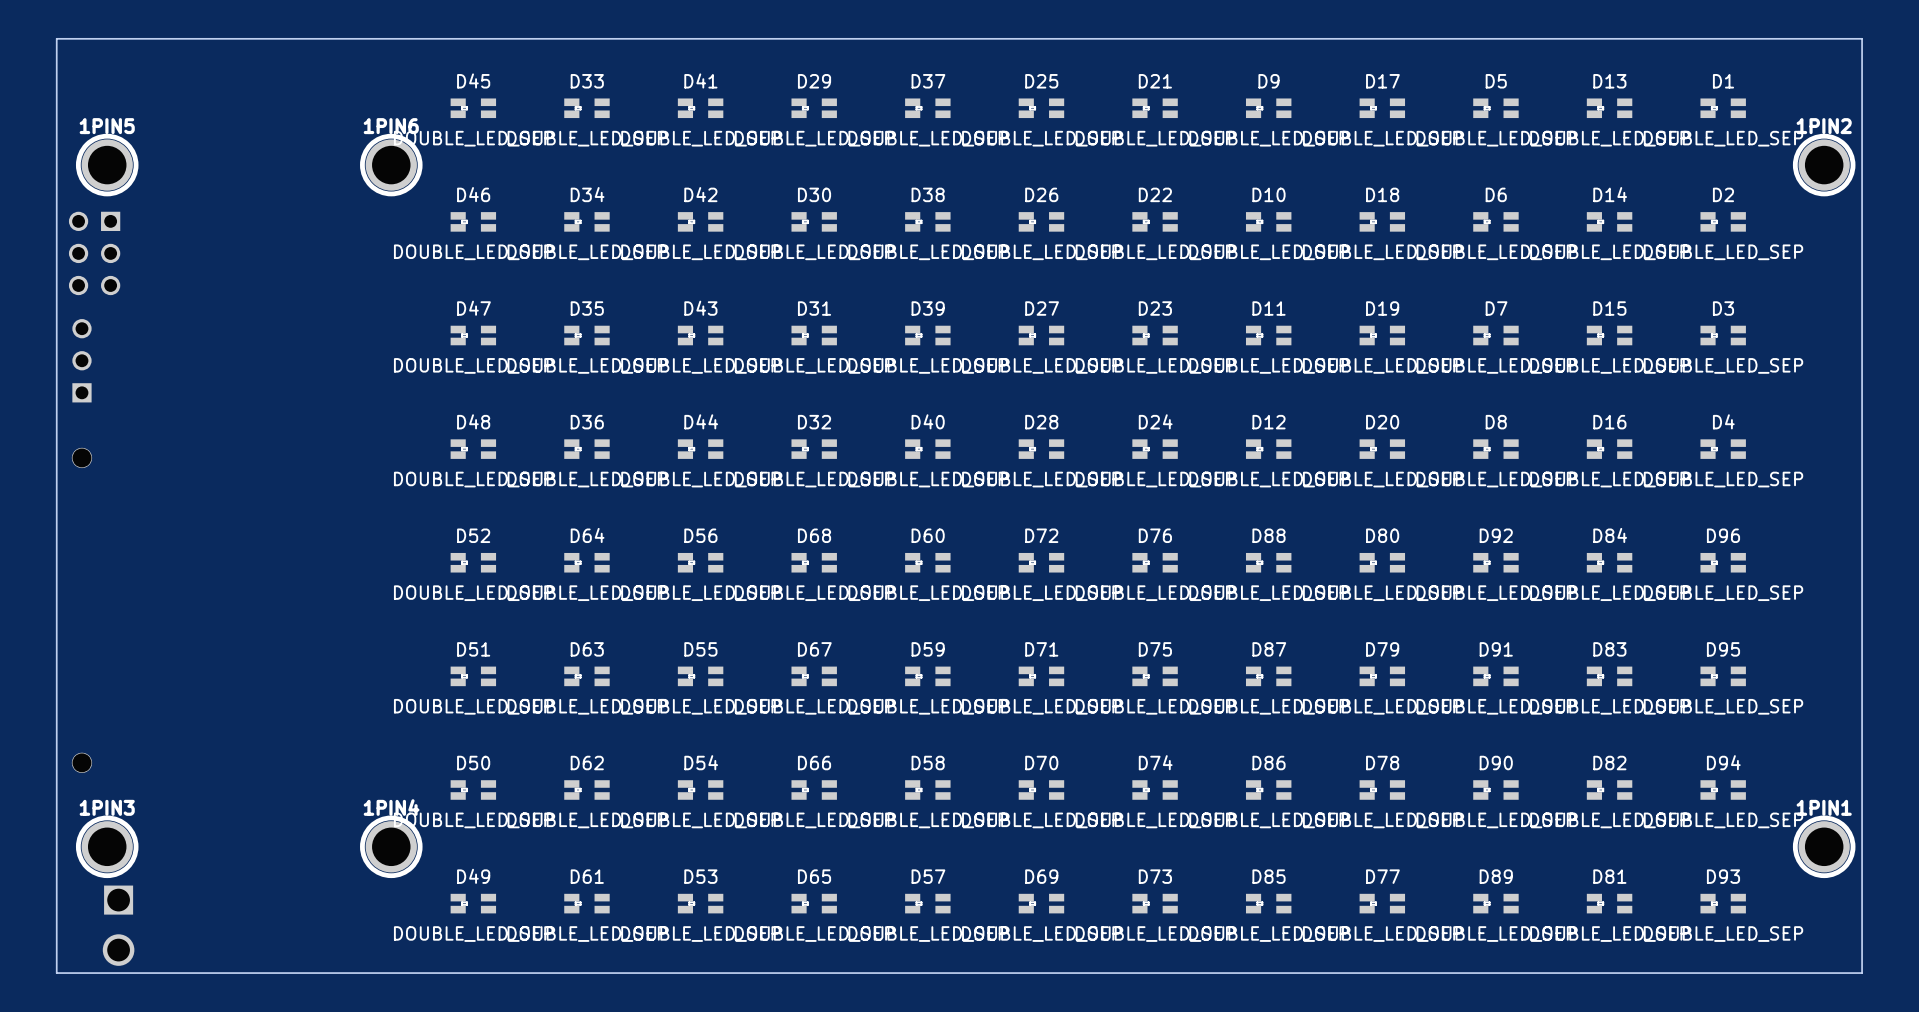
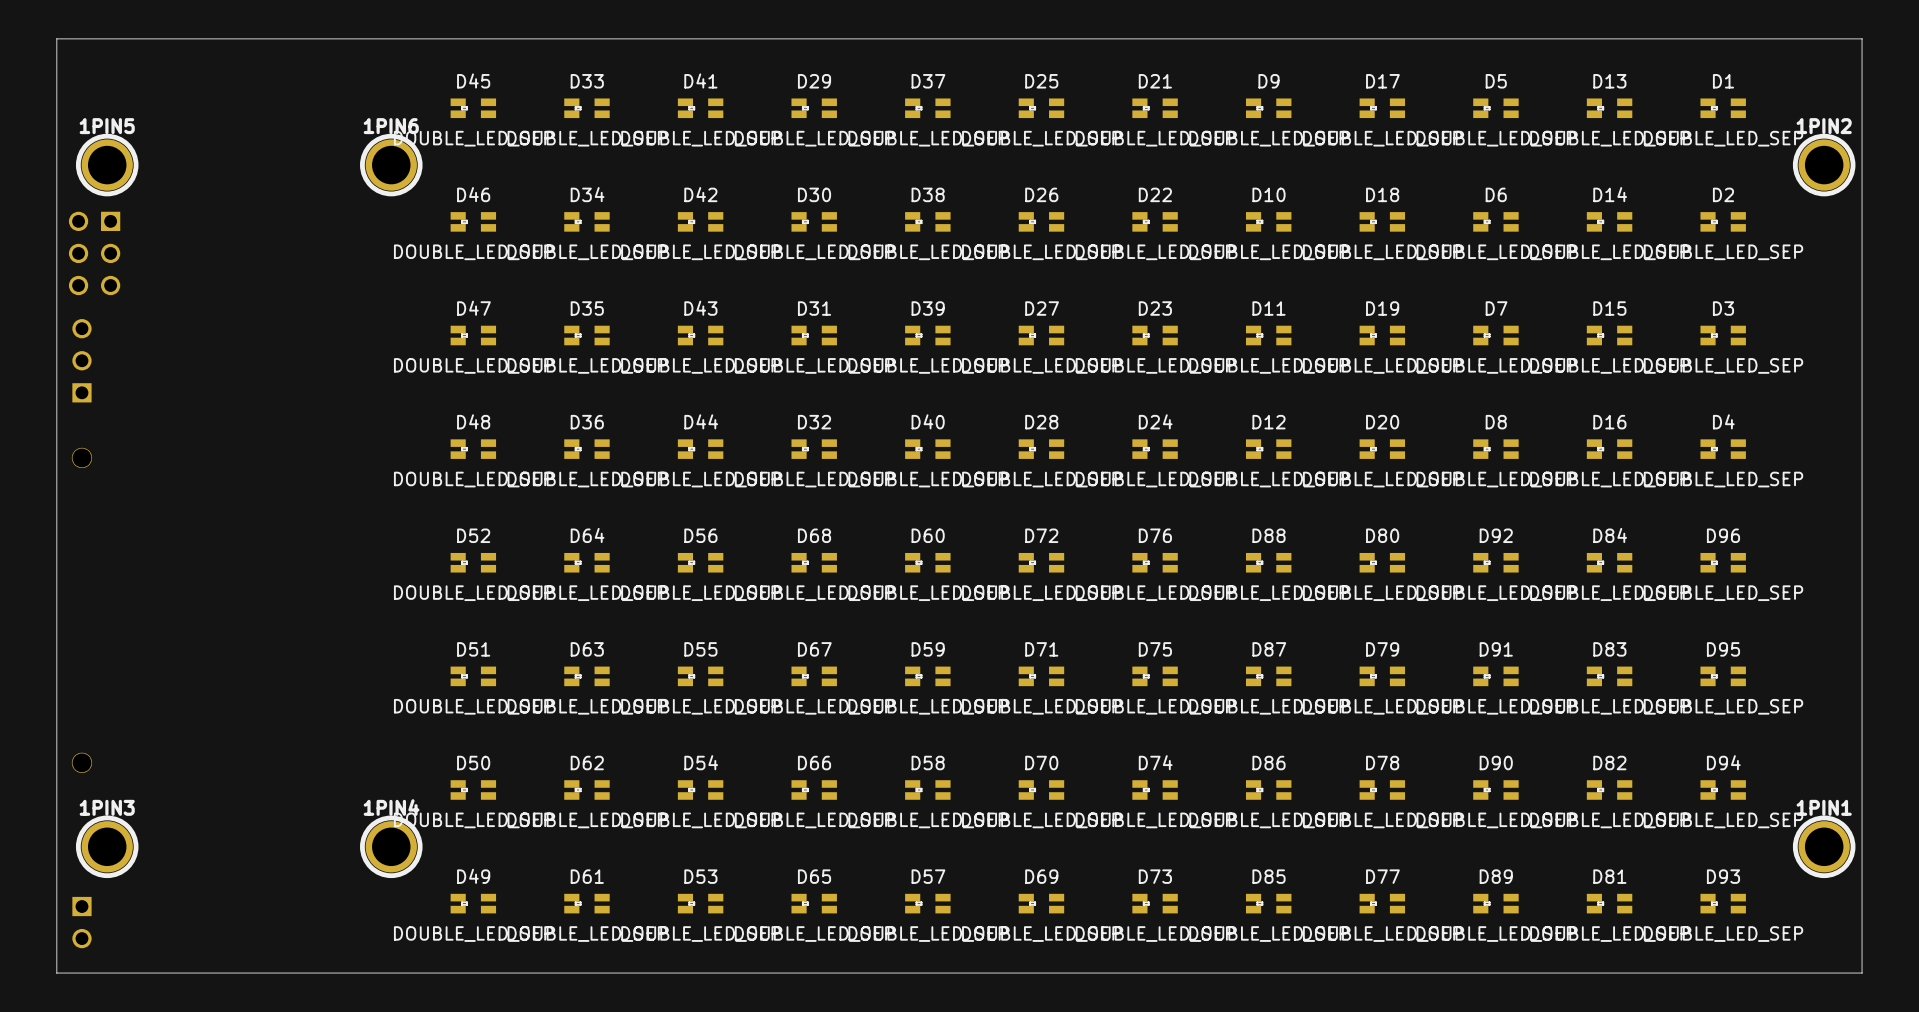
part: none -> (81, 922)
part: (118, 925) -> none

